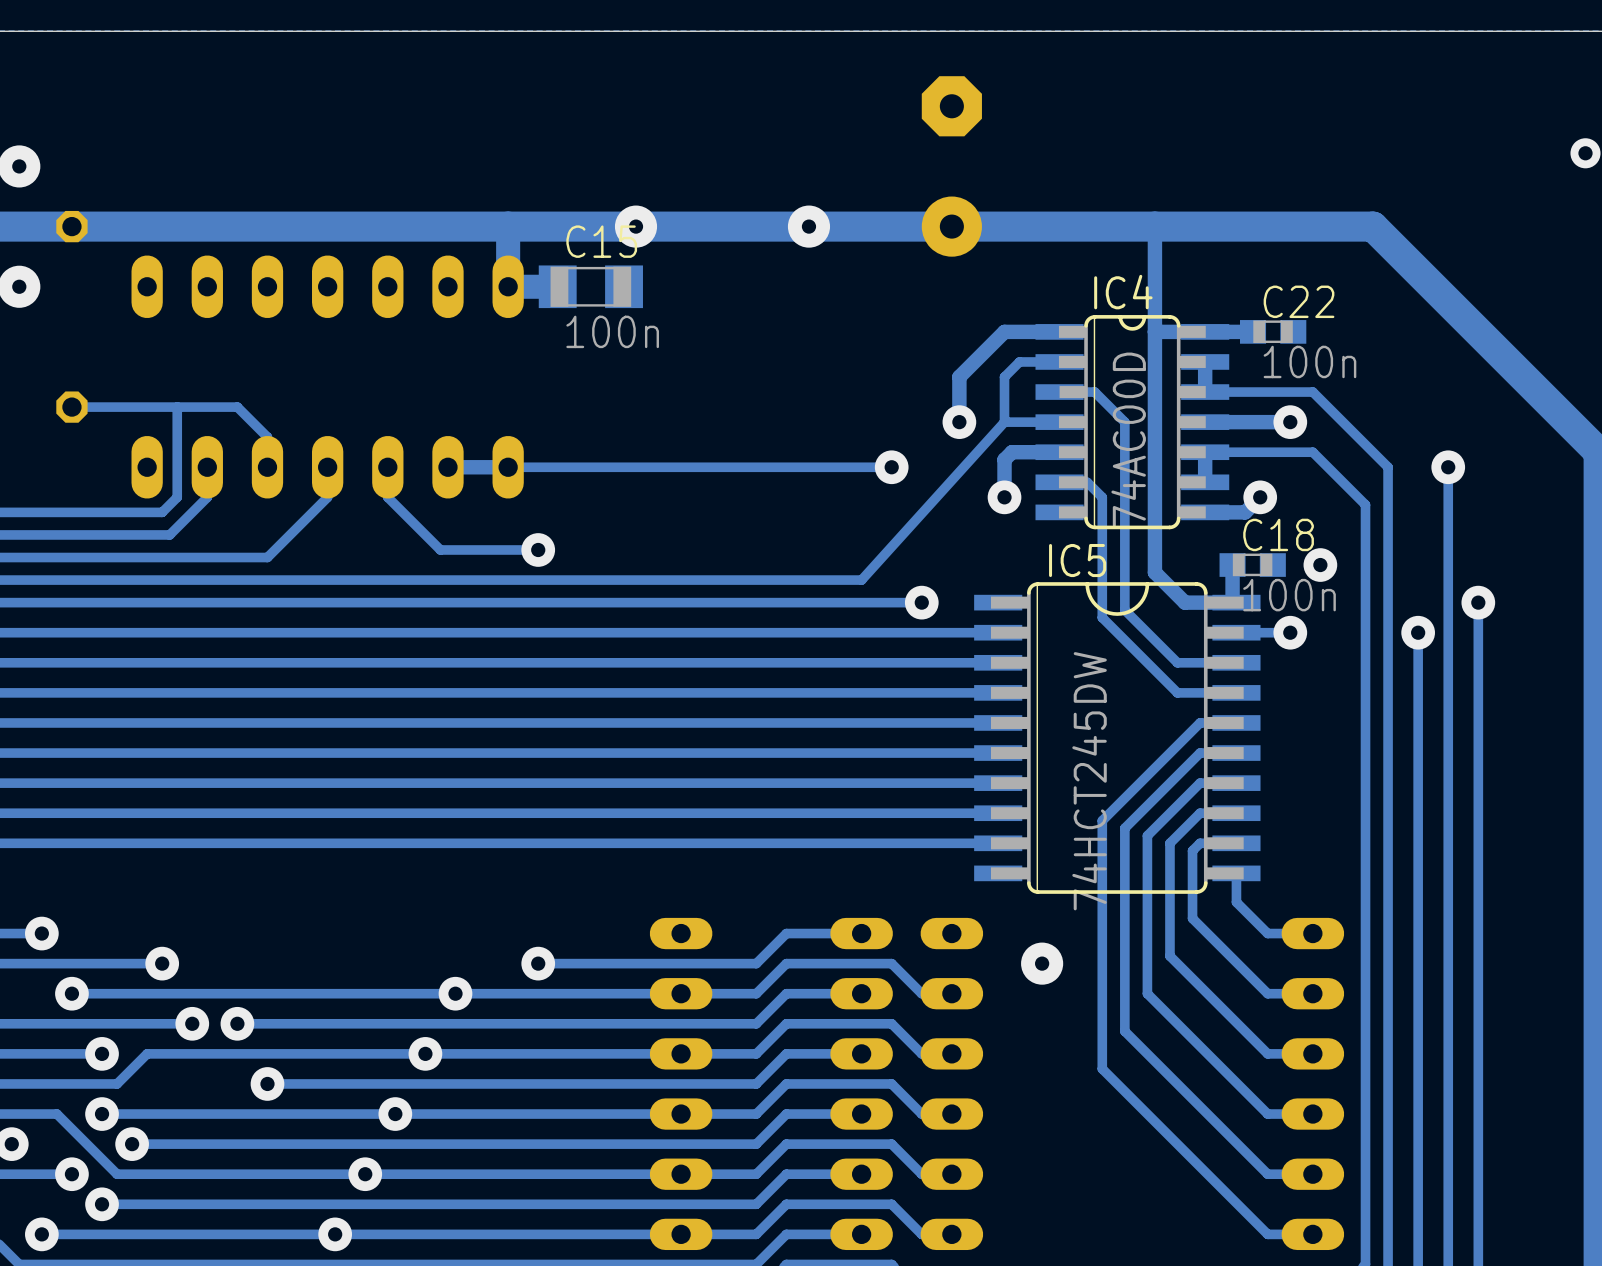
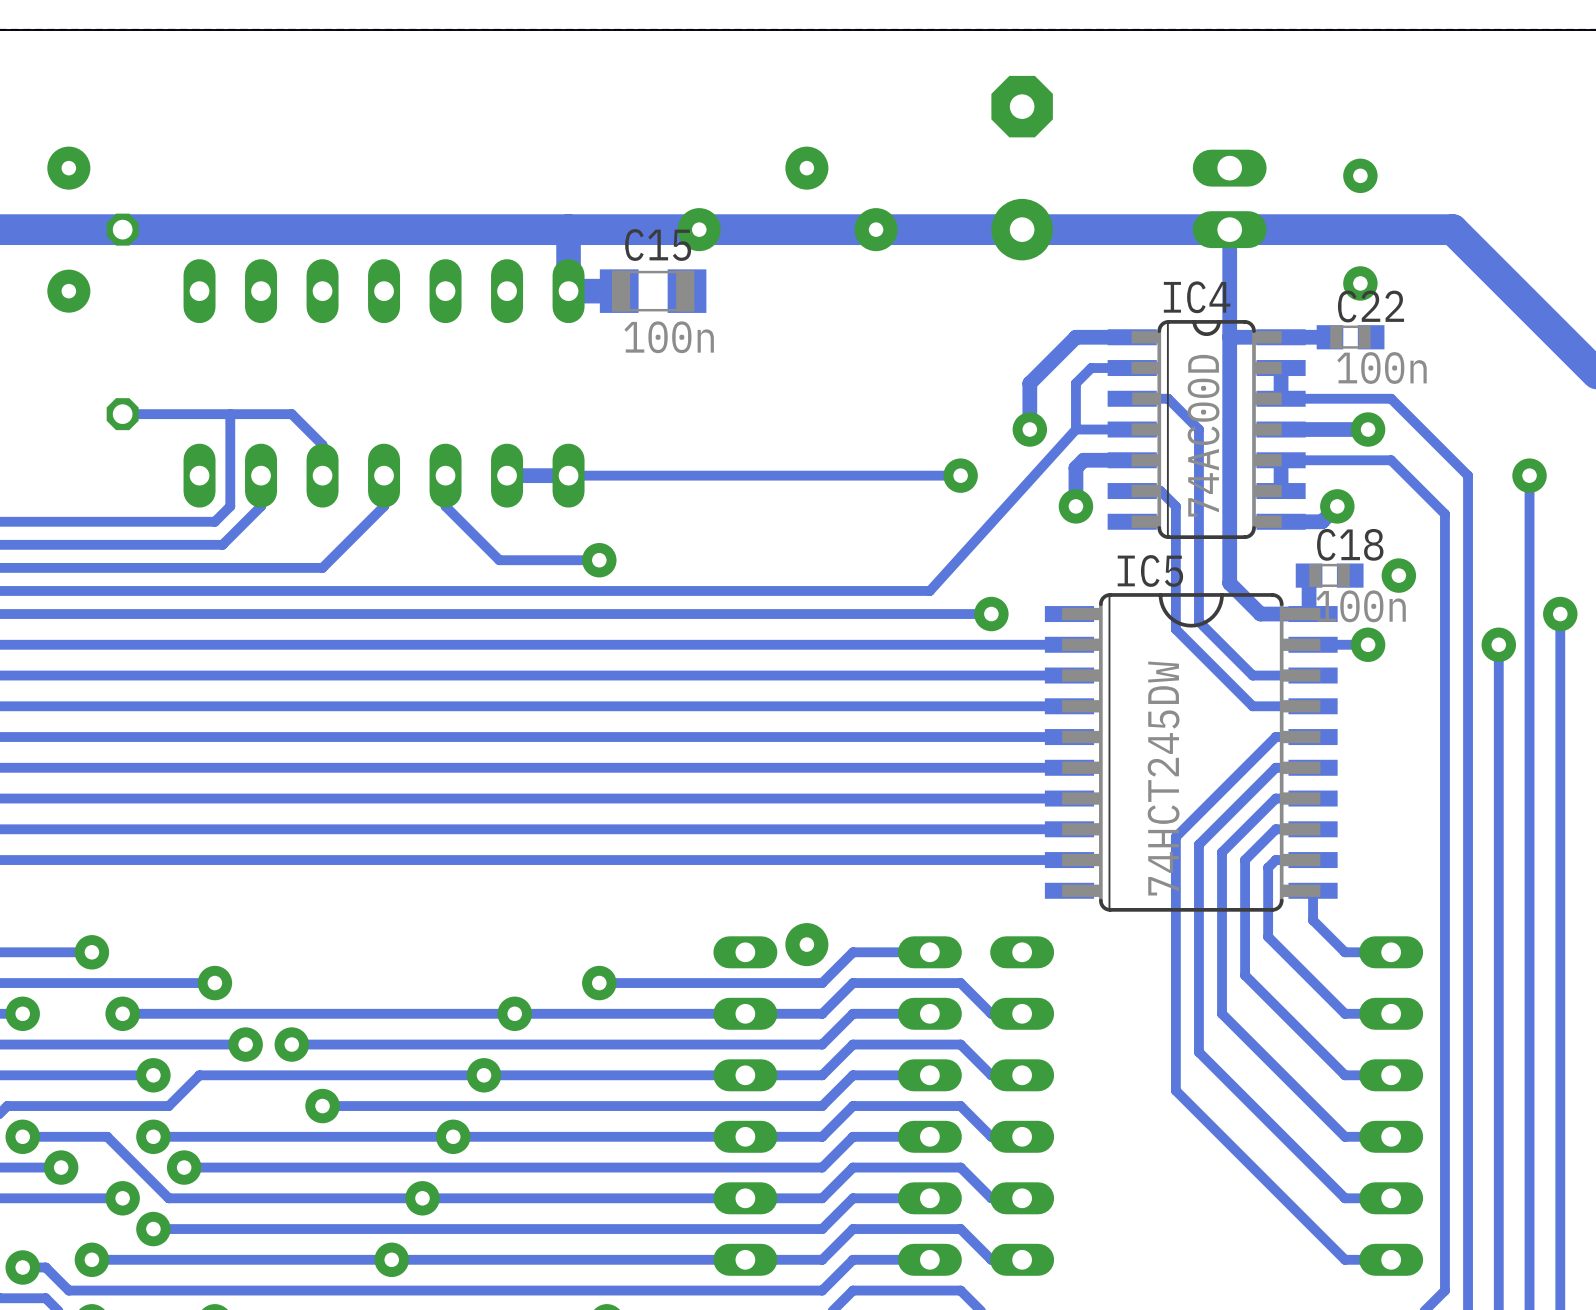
via: none -> (806, 168)
via: none -> (1360, 175)
part: none -> (1229, 198)
via: none -> (1360, 283)
via: none -> (806, 944)
via: (1042, 963) -> none

